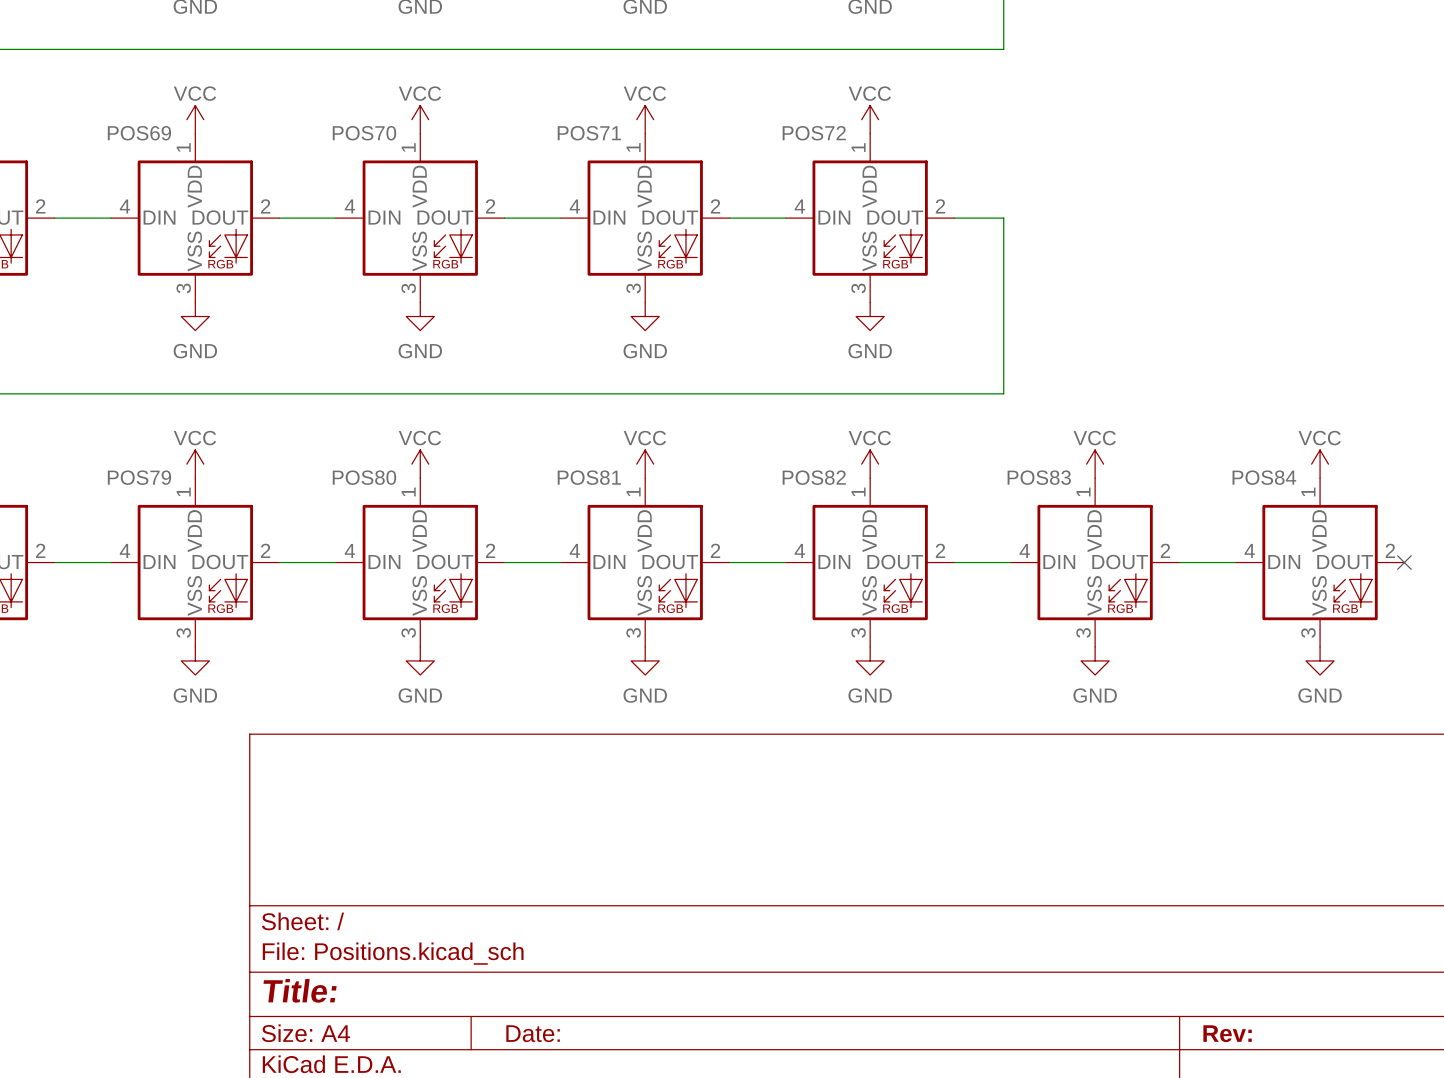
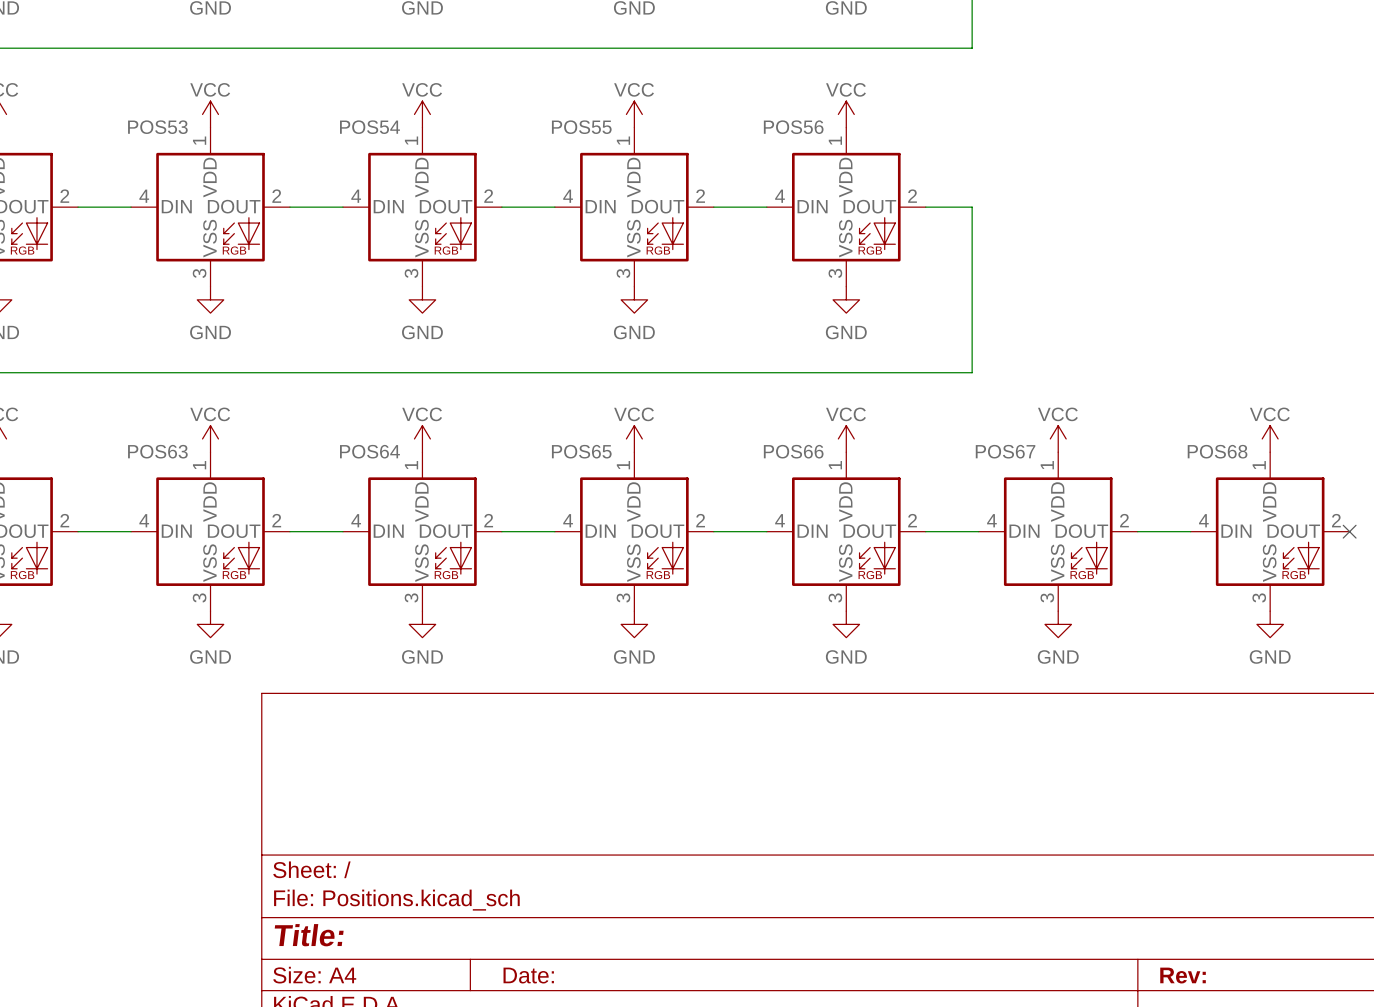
POS69 name: POS69 (139, 133) -> POS53 (157, 127)
POS70 name: POS70 (364, 133) -> POS54 (369, 127)
POS71 name: POS71 (589, 133) -> POS55 (581, 127)
POS72 name: POS72 (814, 133) -> POS56 (793, 127)
POS79 name: POS79 (139, 477) -> POS63 (157, 451)
POS80 name: POS80 (364, 477) -> POS64 (369, 451)
POS81 name: POS81 (589, 477) -> POS65 (581, 451)
POS82 name: POS82 (814, 477) -> POS66 (793, 451)
POS83 name: POS83 (1039, 477) -> POS67 (1005, 451)
POS84 name: POS84 (1264, 477) -> POS68 (1217, 451)

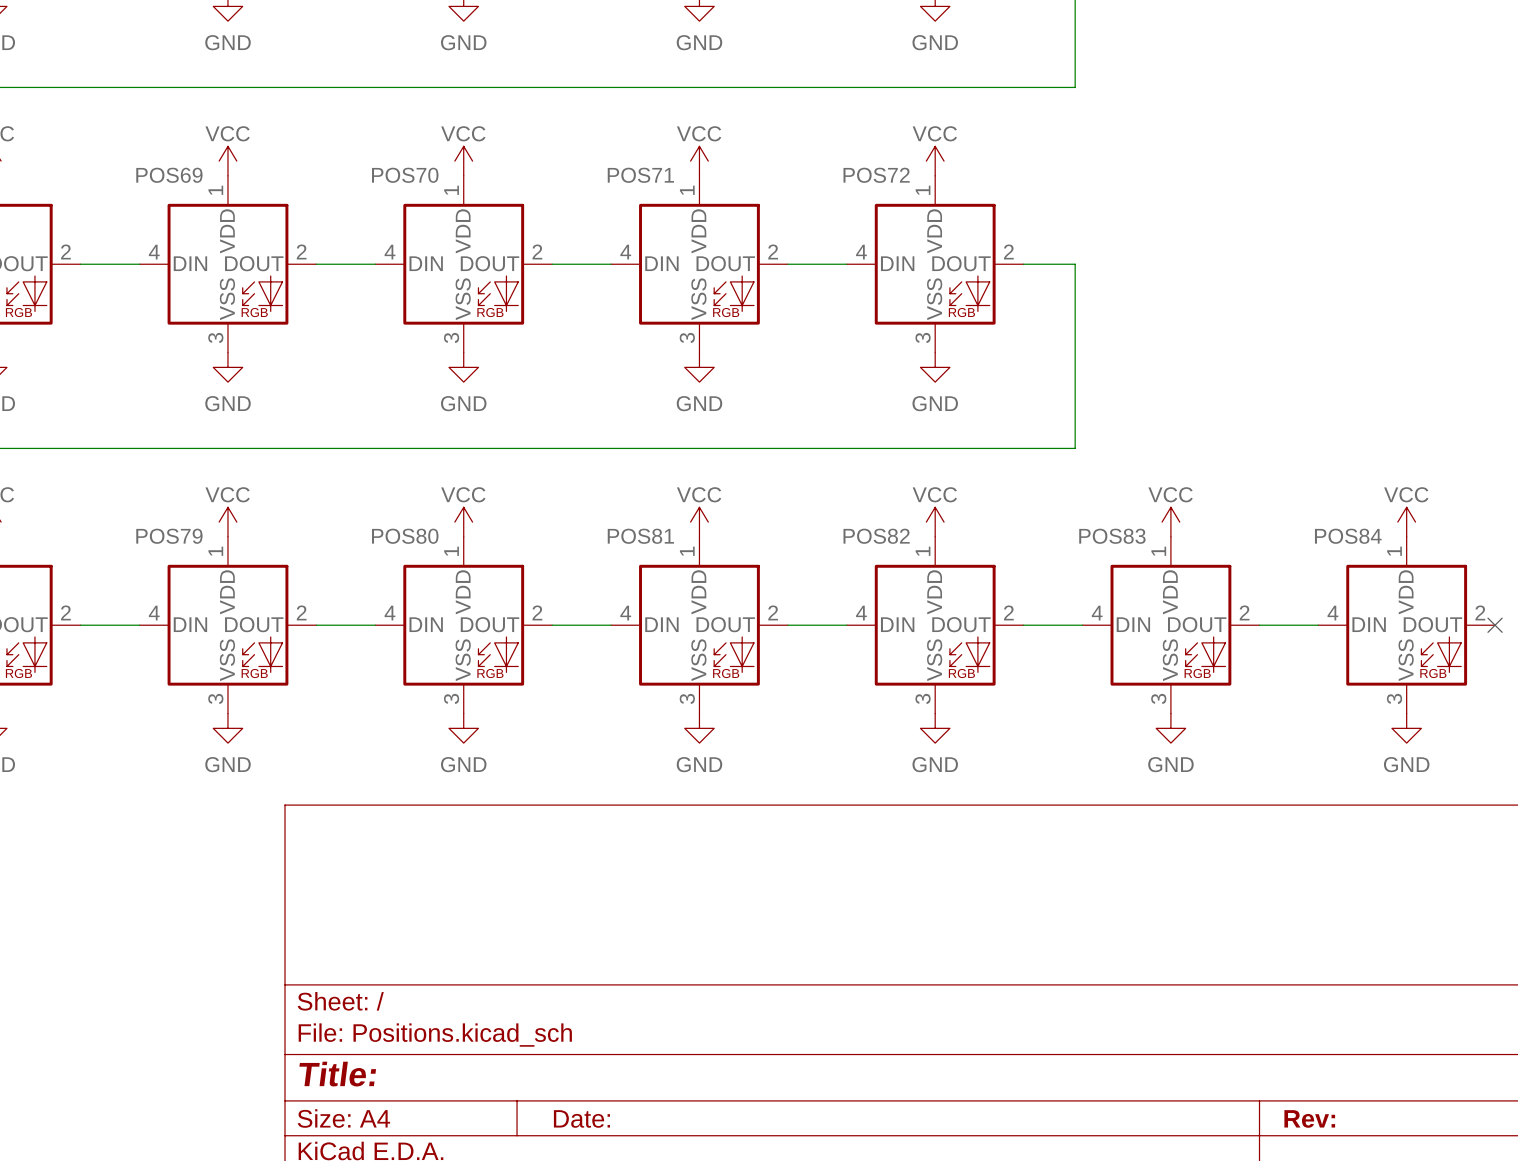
POS53 name: POS53 (157, 127) -> POS69 (169, 175)
POS54 name: POS54 (369, 127) -> POS70 (405, 175)
POS55 name: POS55 (581, 127) -> POS71 (640, 175)
POS56 name: POS56 (793, 127) -> POS72 (876, 175)
POS63 name: POS63 (157, 451) -> POS79 (169, 536)
POS64 name: POS64 (369, 451) -> POS80 (405, 536)
POS65 name: POS65 (581, 451) -> POS81 (640, 536)
POS66 name: POS66 (793, 451) -> POS82 (876, 536)
POS67 name: POS67 (1005, 451) -> POS83 (1112, 536)
POS68 name: POS68 (1217, 451) -> POS84 (1348, 536)

